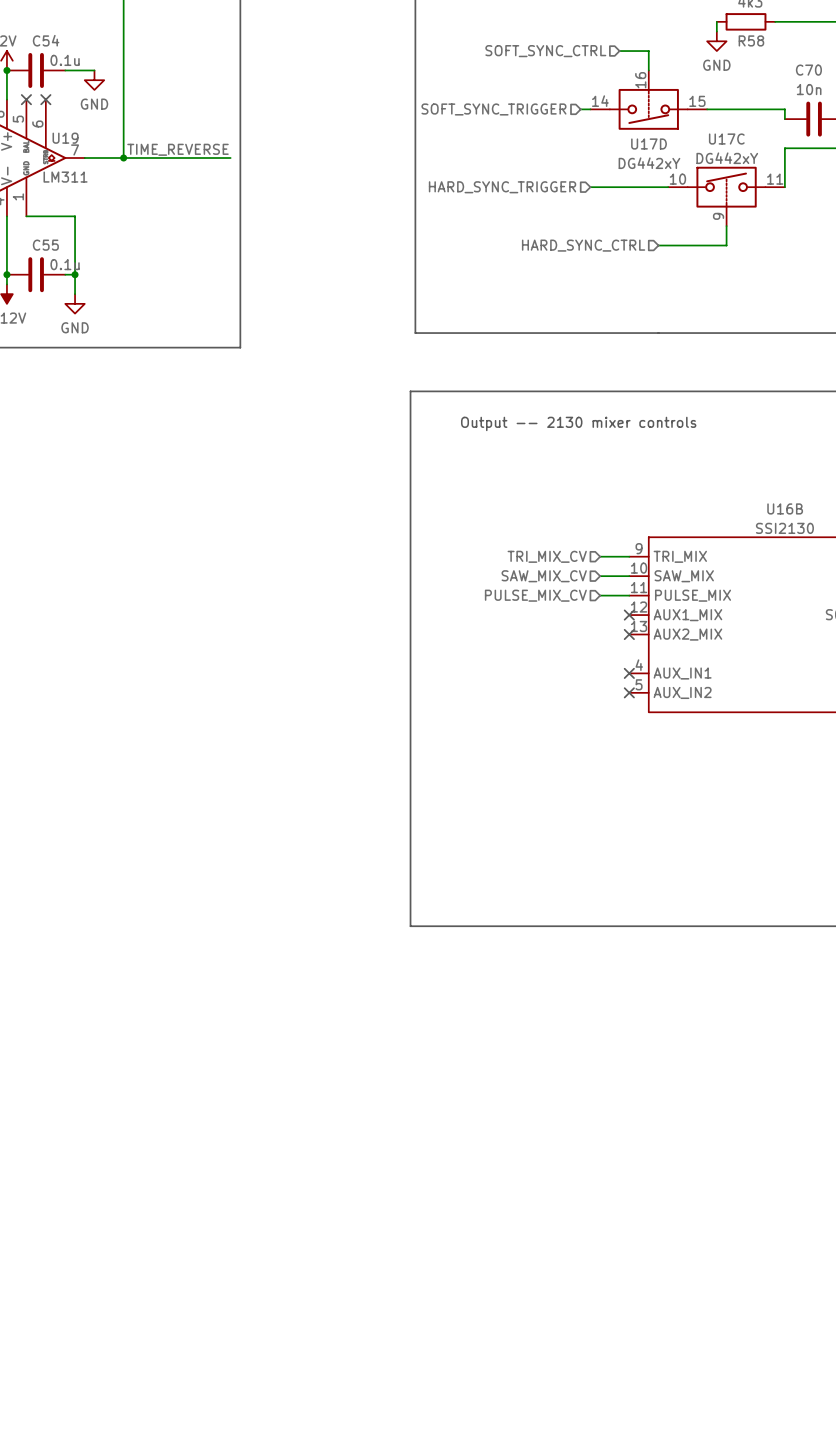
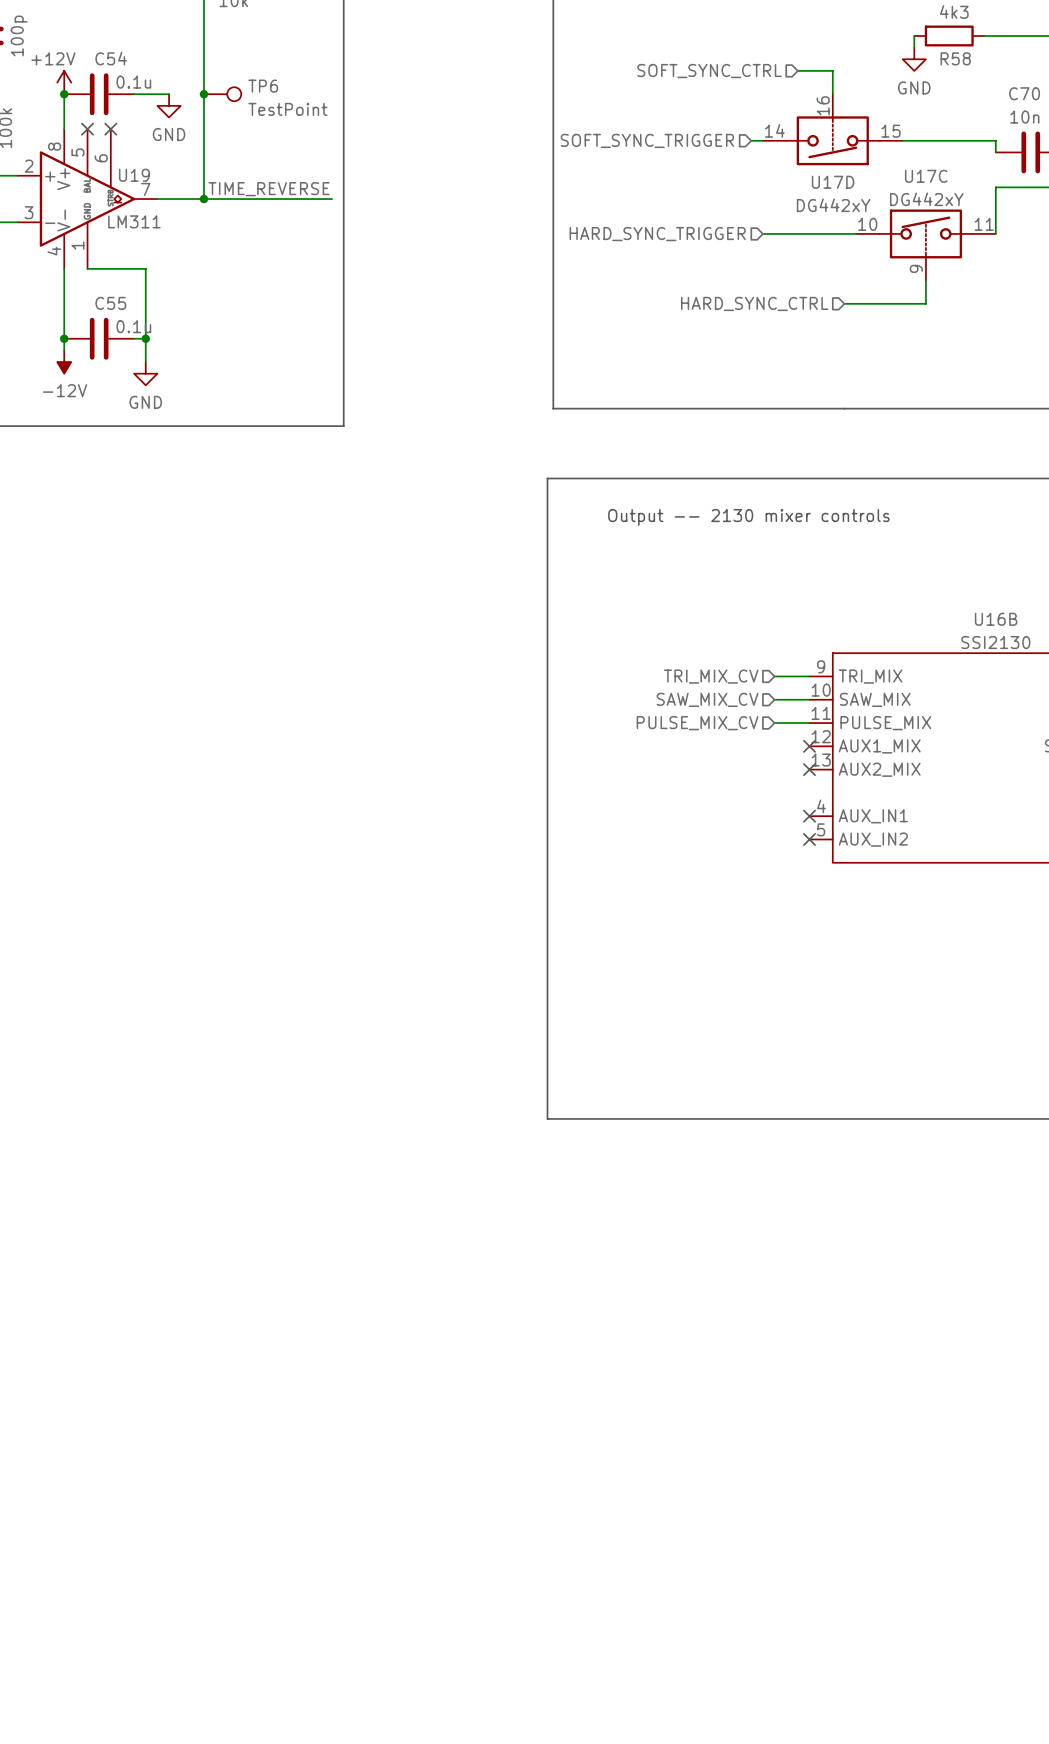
junction: none -> (203, 94)
TP6: none -> TestPoint (222, 94)

